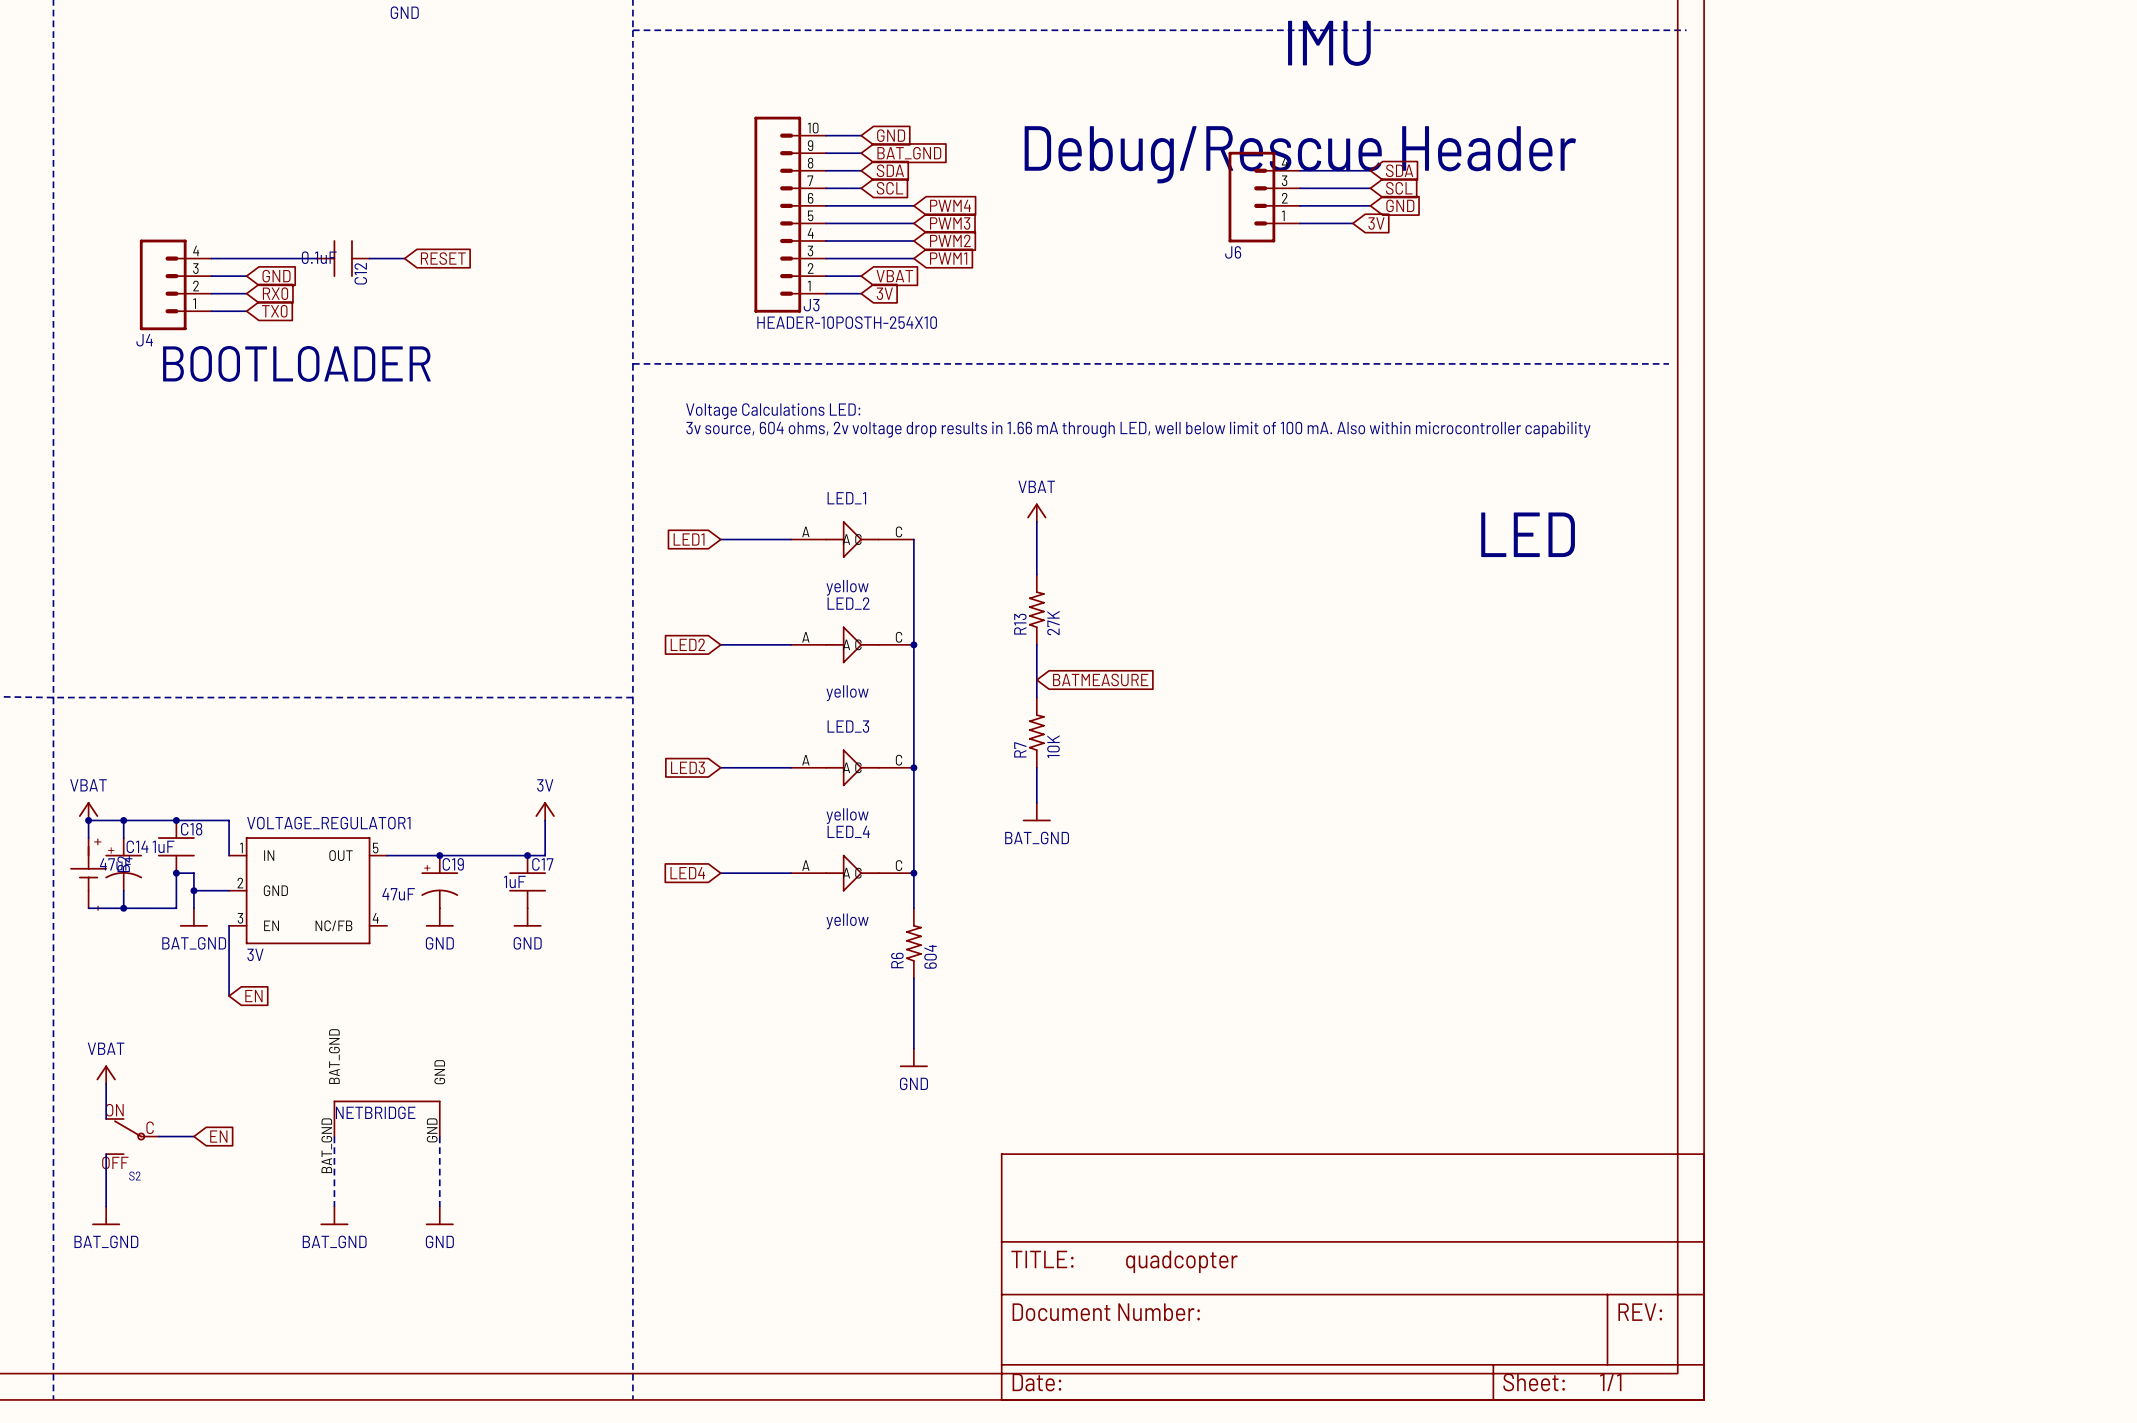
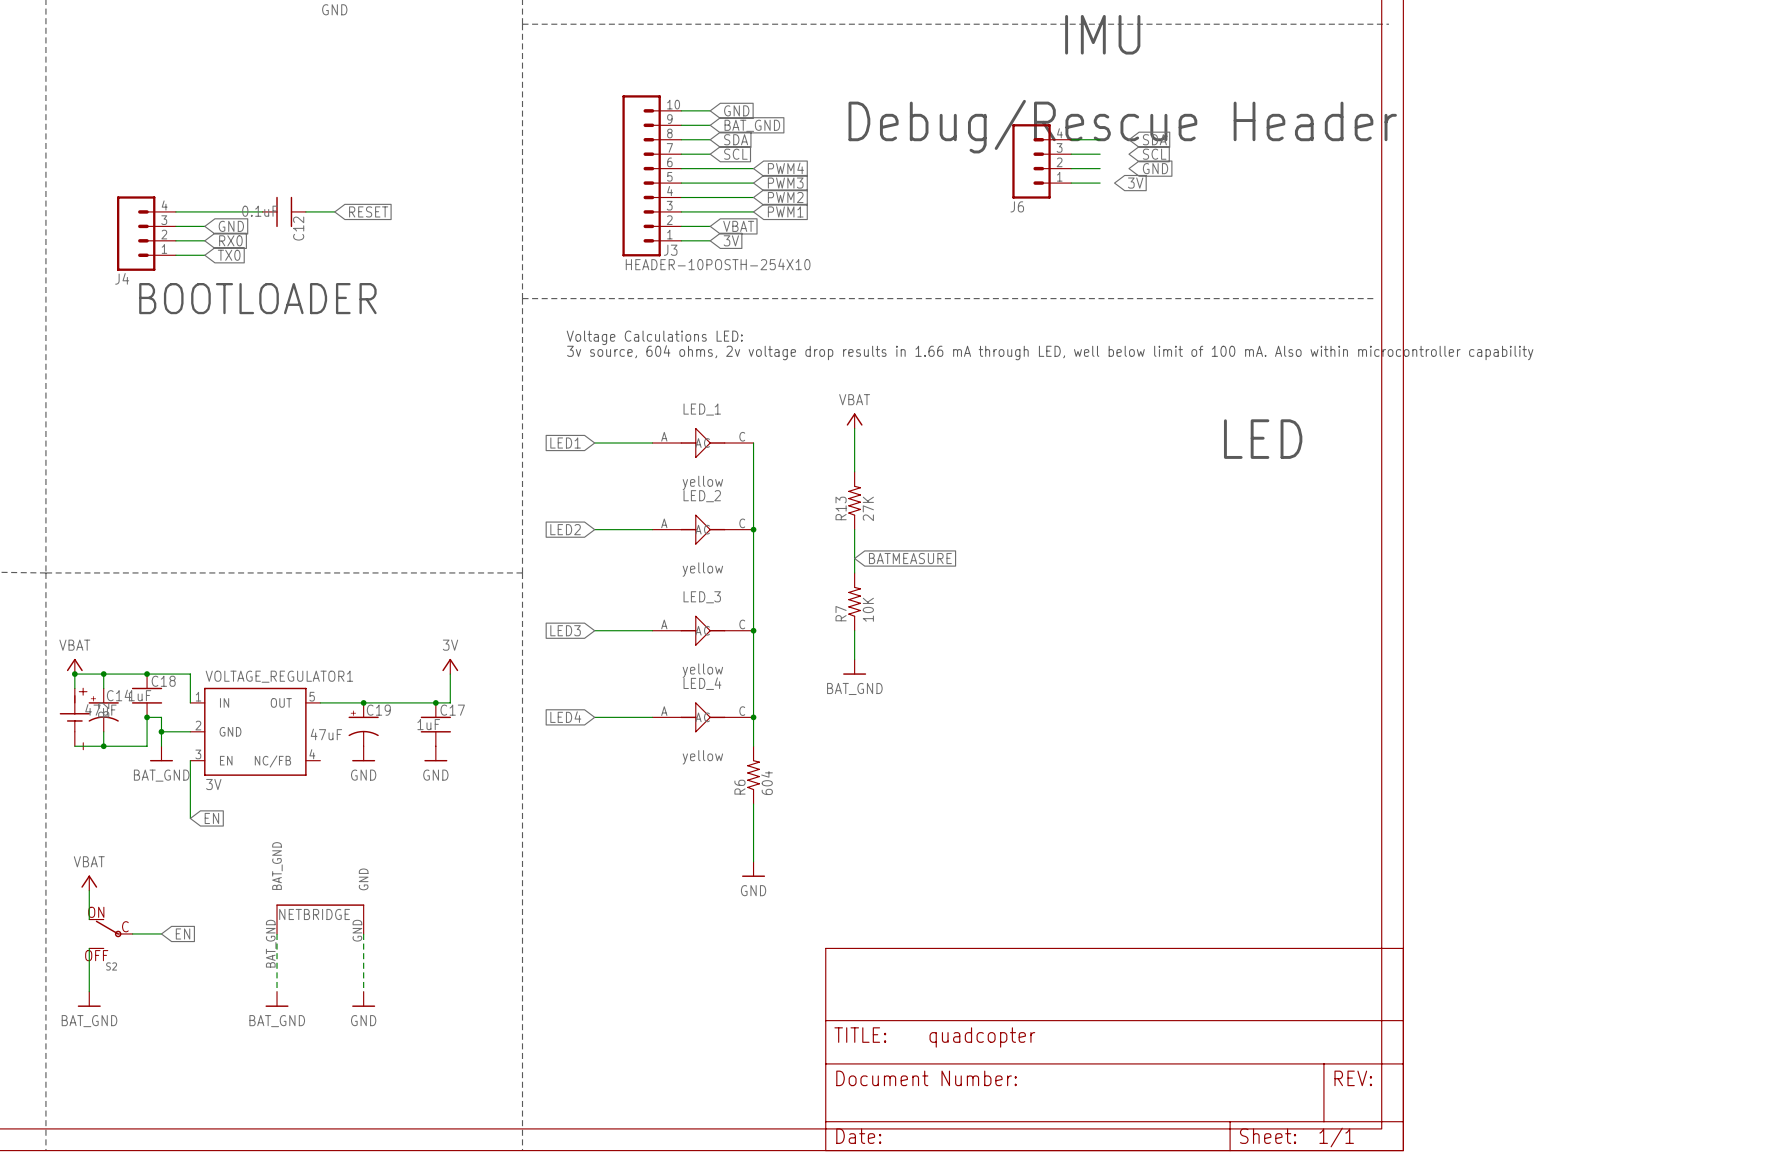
wire: (1335, 170) (1370, 170) -> none
wire: (1335, 188) (1370, 188) -> none
wire: (1335, 205) (1370, 205) -> none
wire: (1335, 223) (1352, 223) -> none

